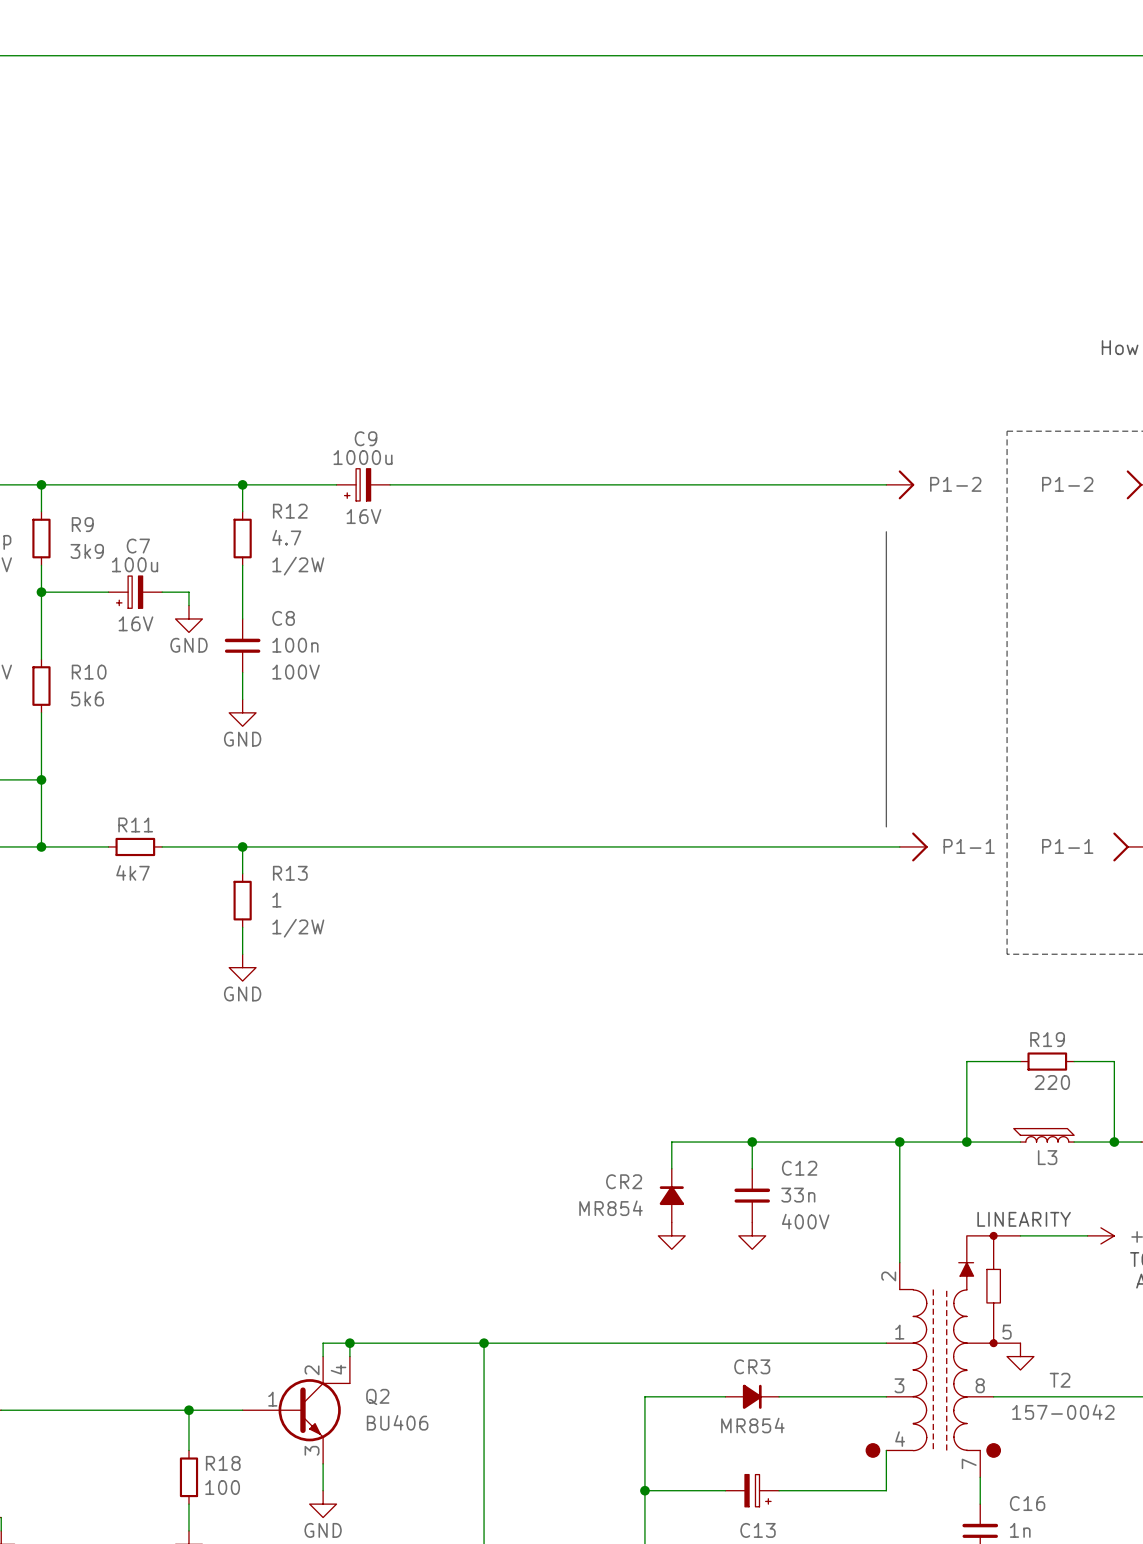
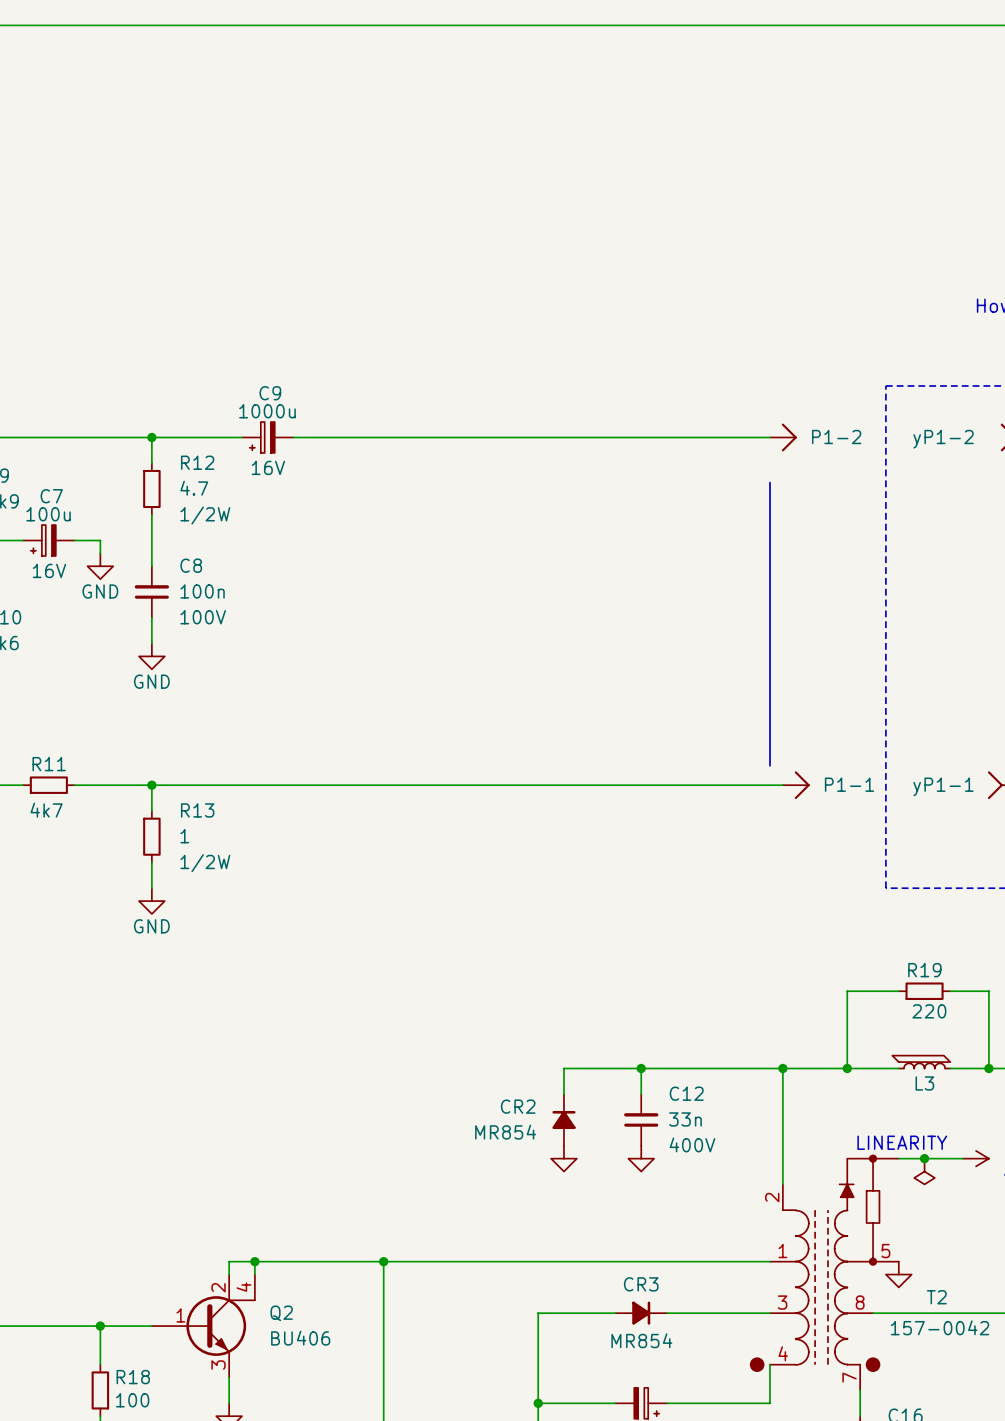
P1-2 name: P1-2 (1067, 484) -> yP1-2 (943, 439)
P1-1 name: P1-1 (1067, 846) -> yP1-1 (943, 786)
junction: none -> (924, 1158)
power symbol: none -> (924, 1171)

